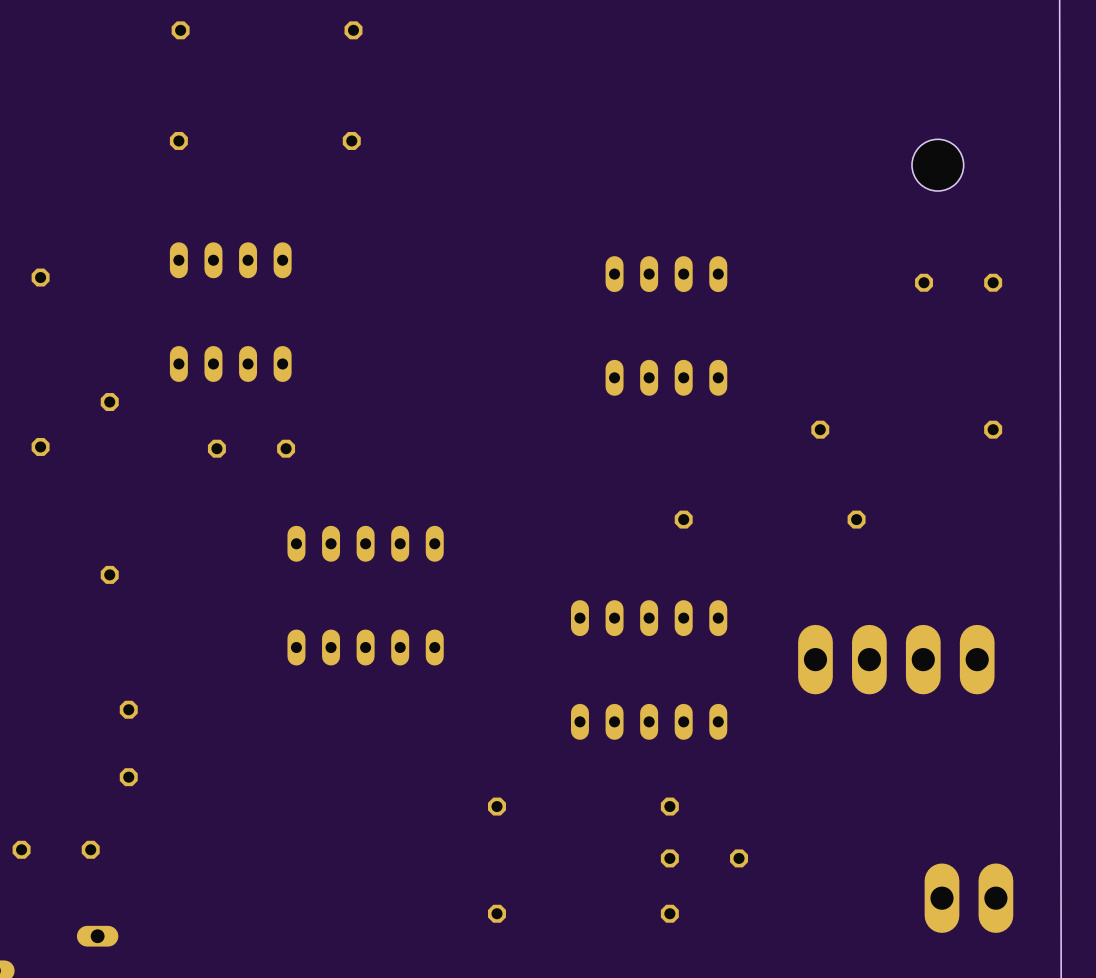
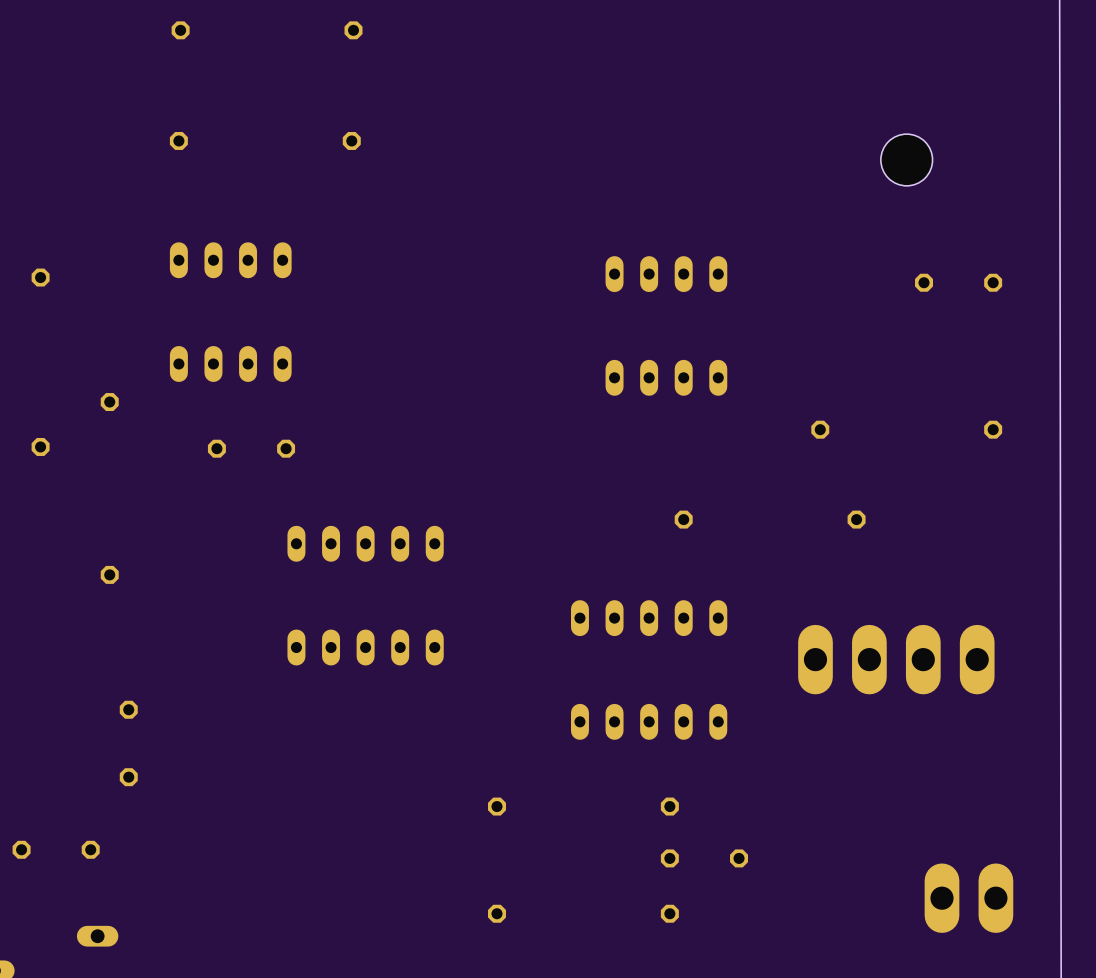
hole position: (937, 165) -> (906, 159)

